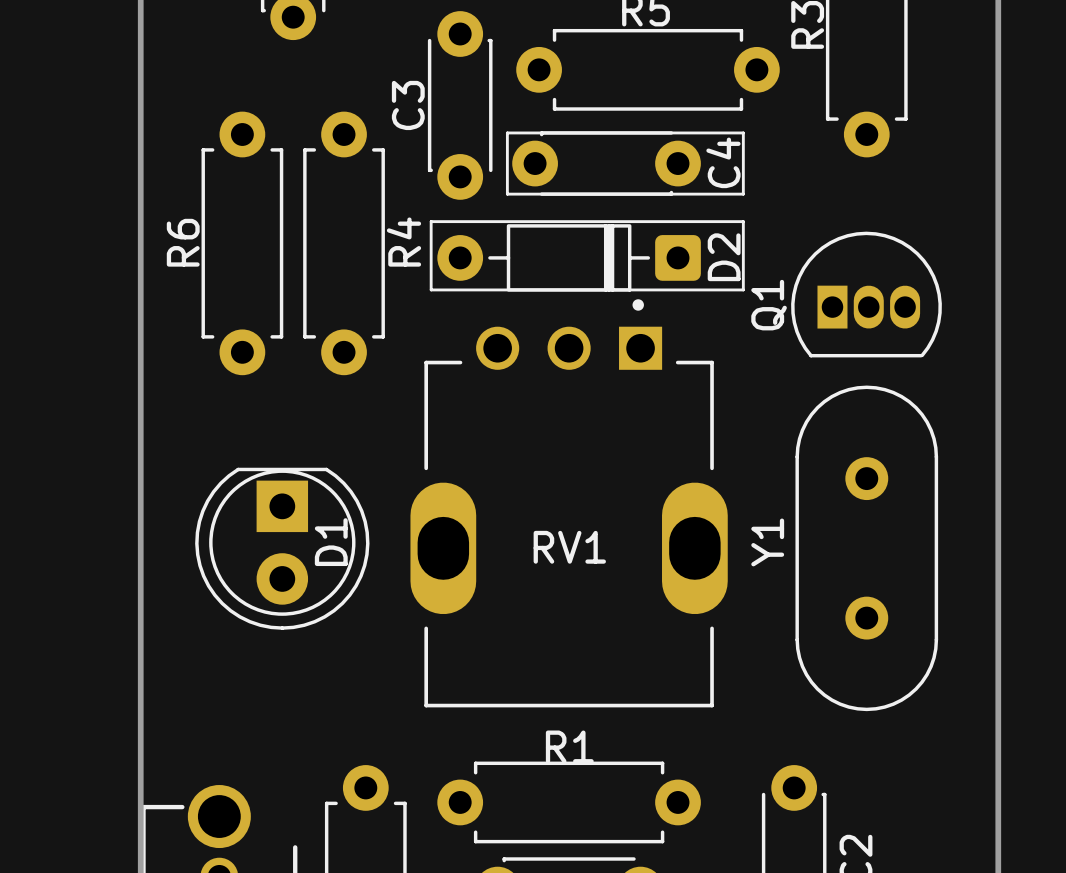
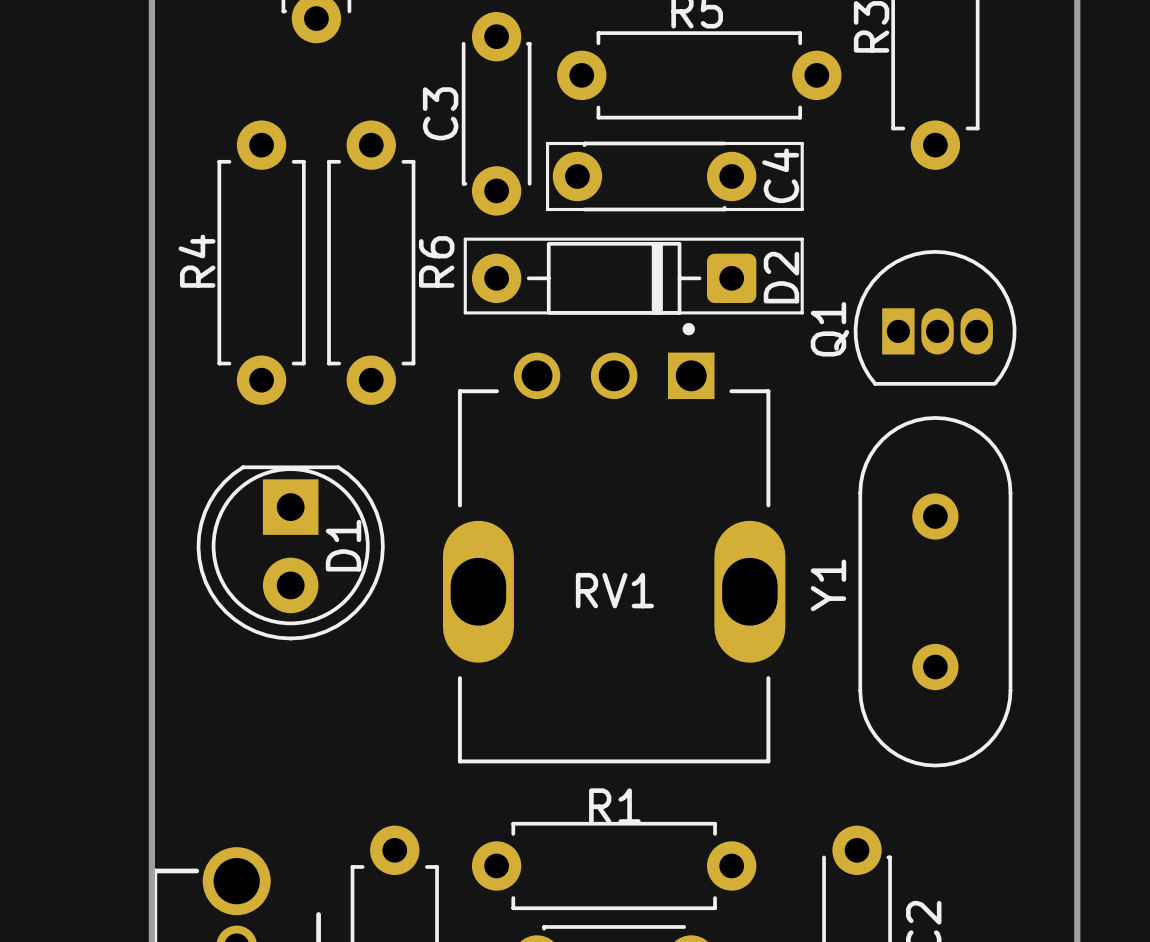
R6 name: R6 (183, 242) -> R4 (197, 261)
R4 name: R4 (404, 242) -> R6 (436, 261)
D1 position: (282, 548) -> (290, 552)

